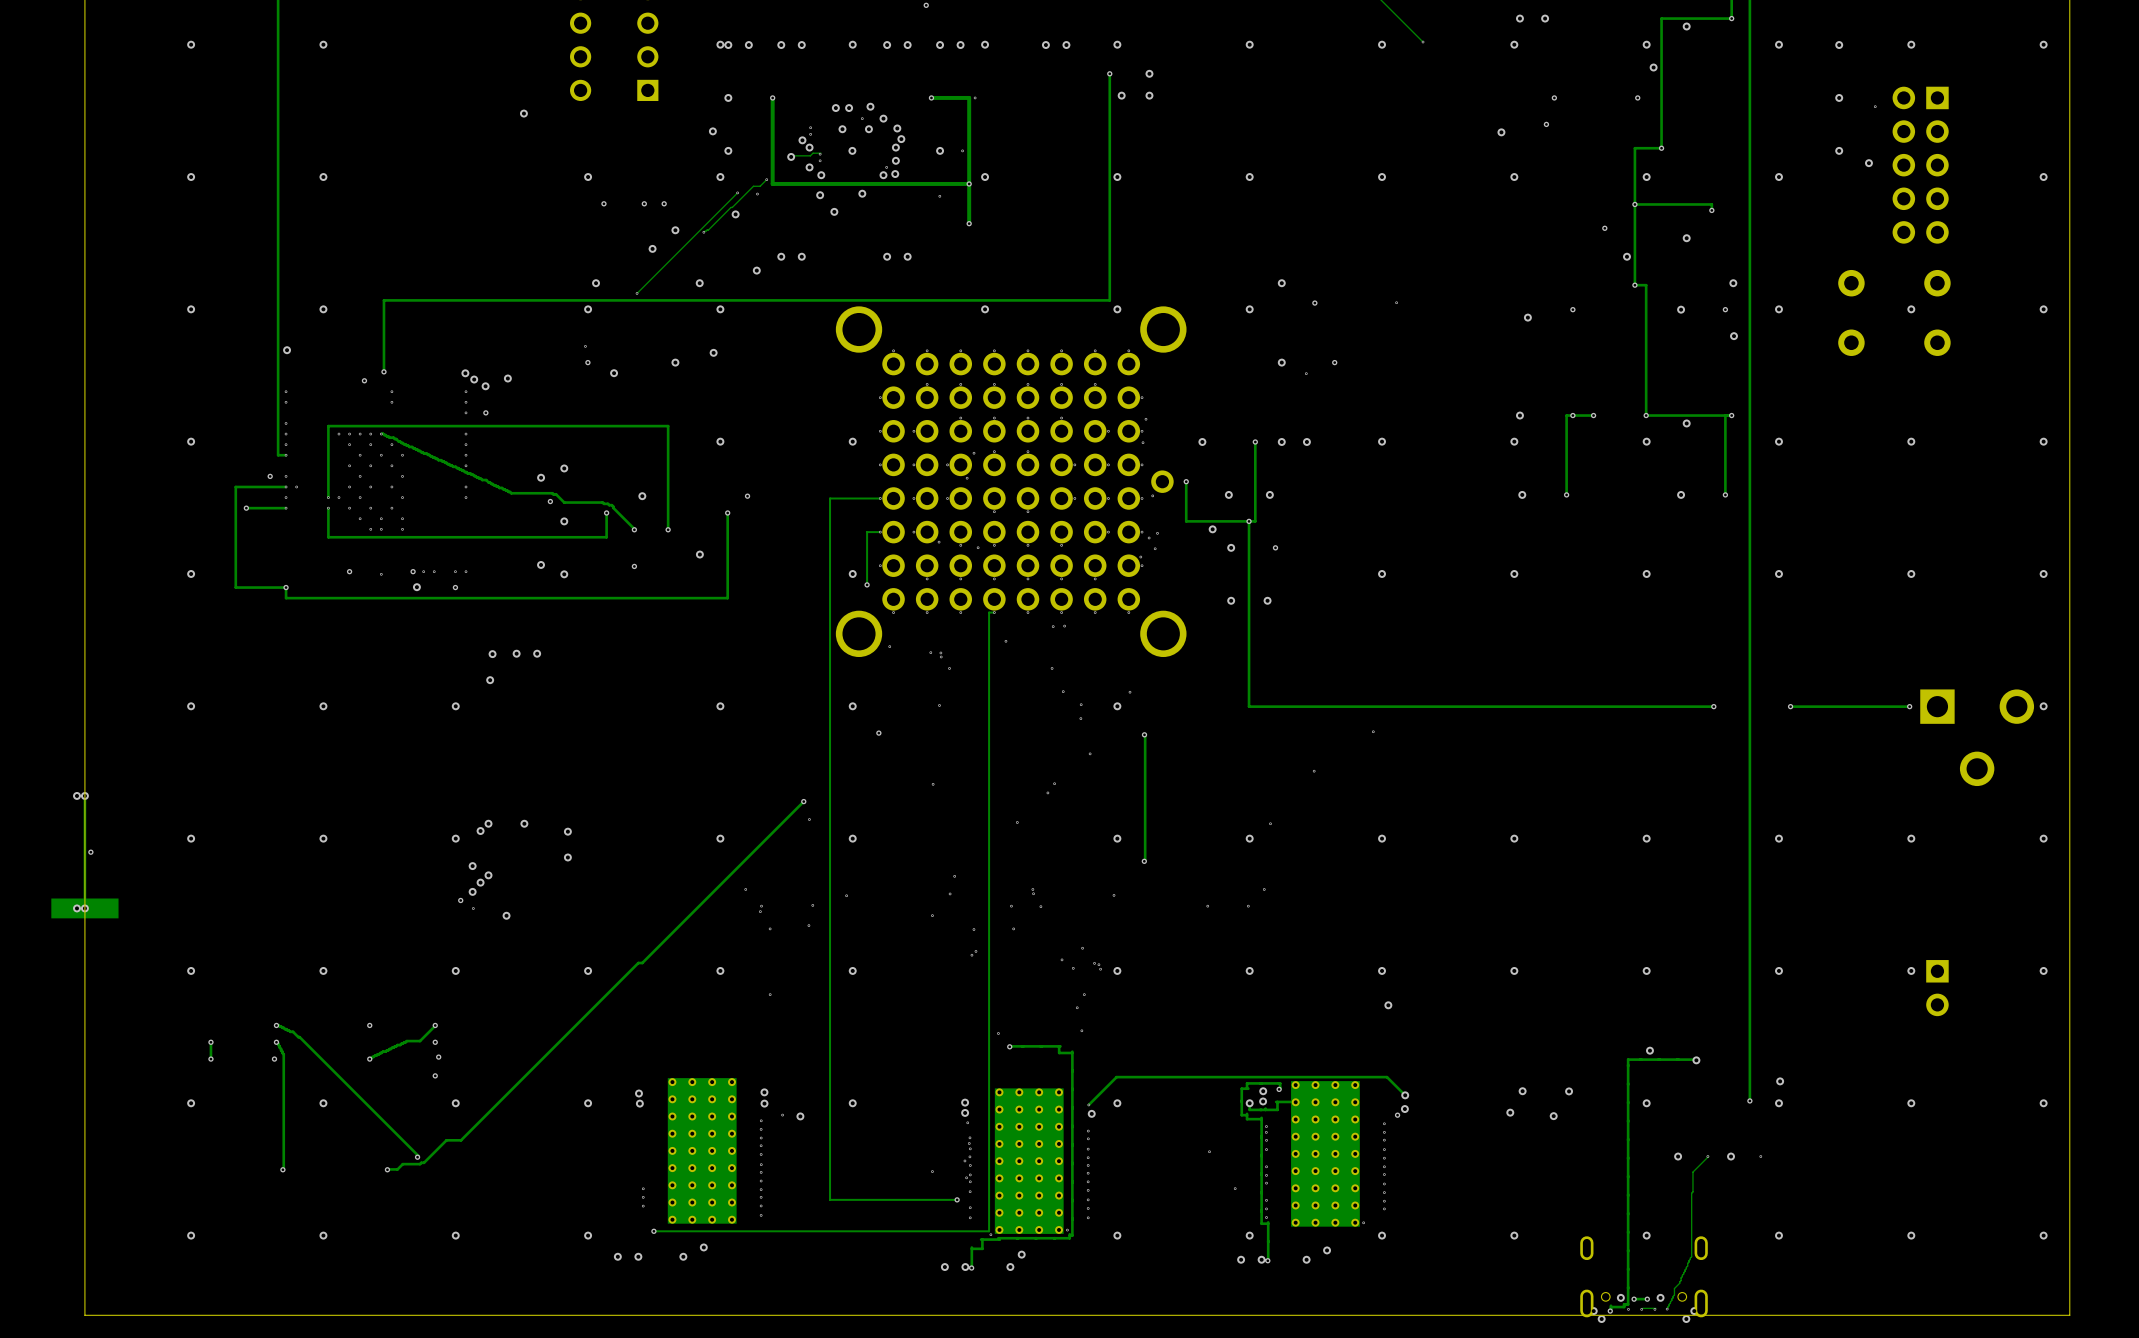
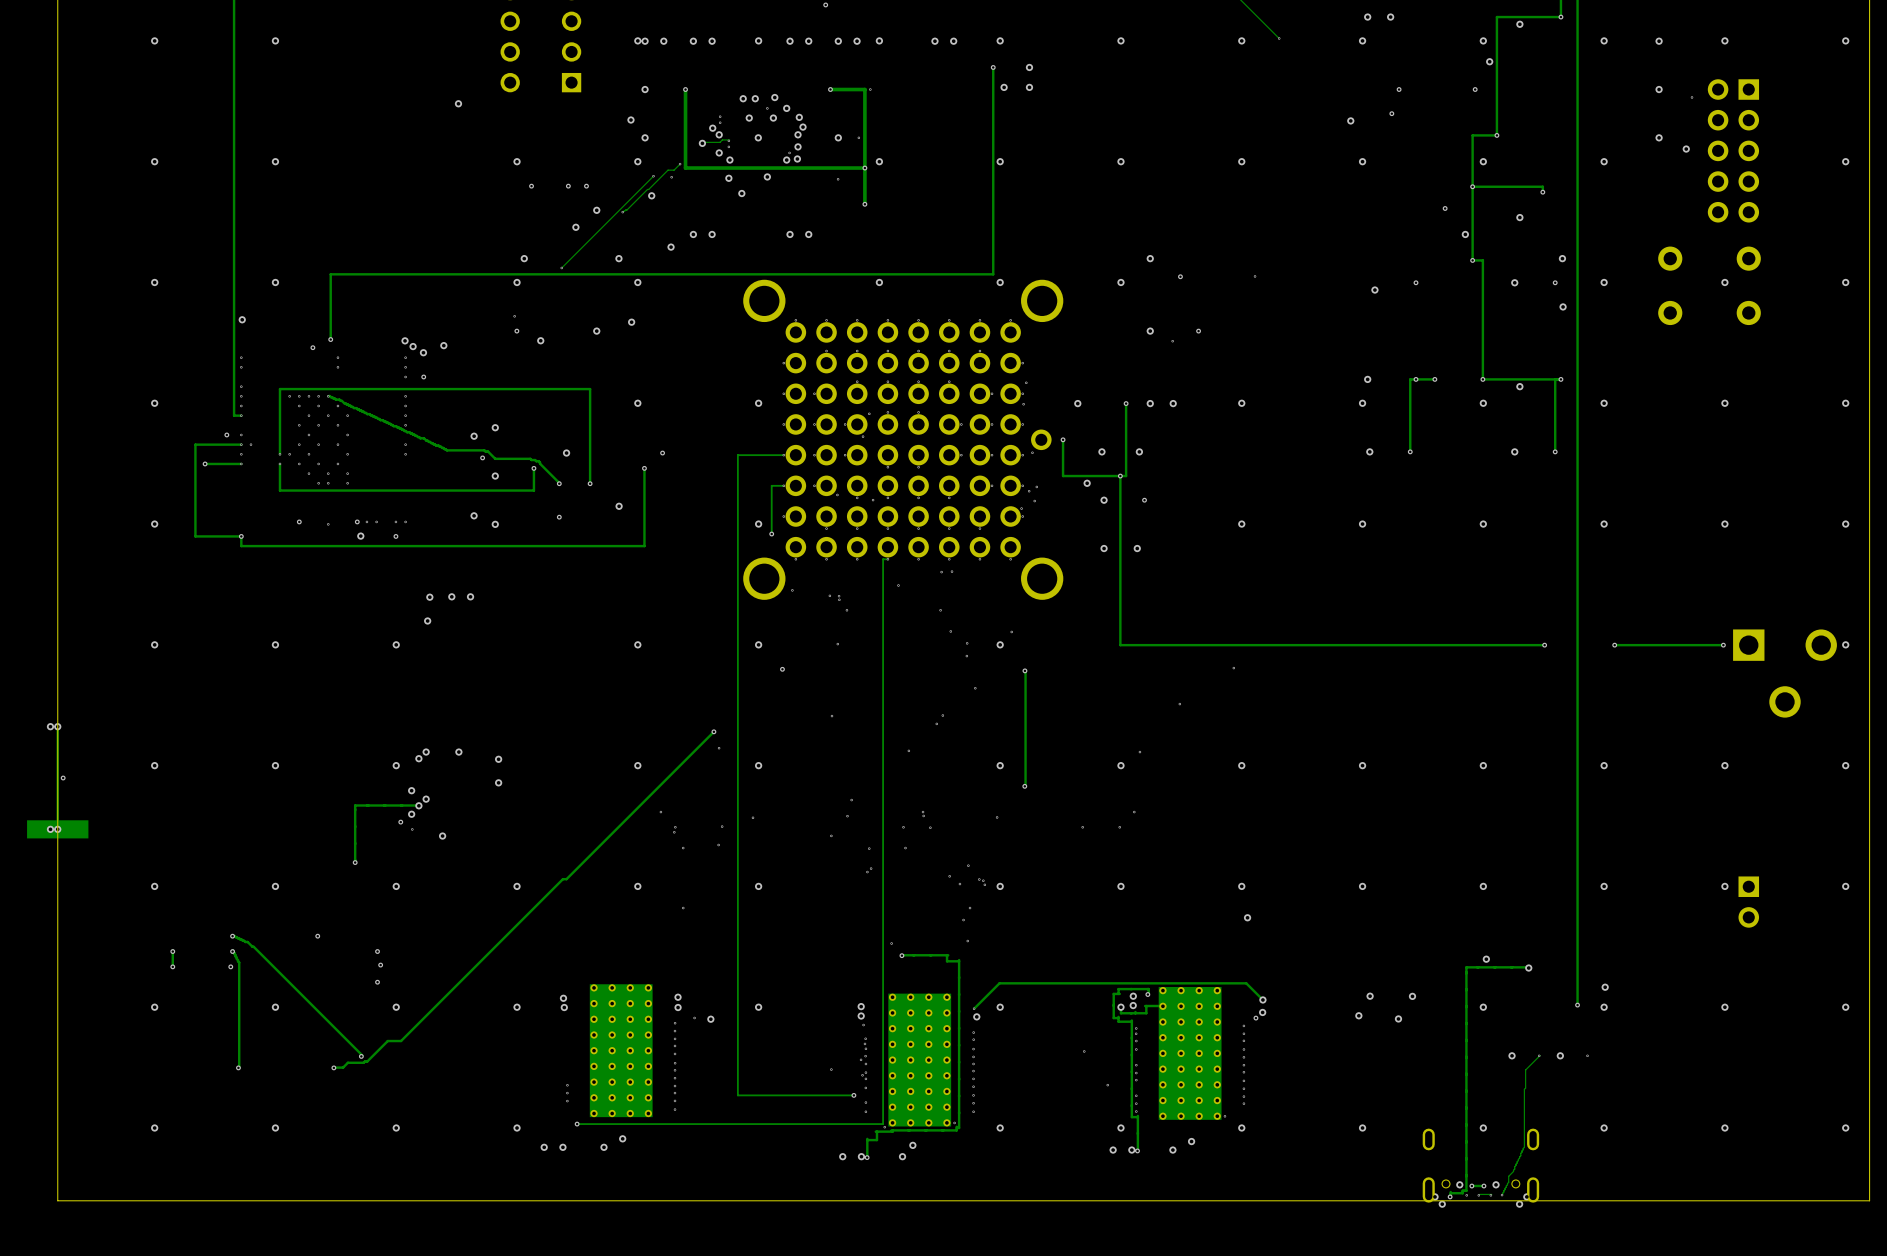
track: none -> (419, 805) (355, 805) (355, 862)
via: none -> (355, 862)
track: (435, 1025) (420, 1041) (406, 1041) (369, 1058) -> none
via: (435, 1025) -> none
via: (369, 1059) -> none

